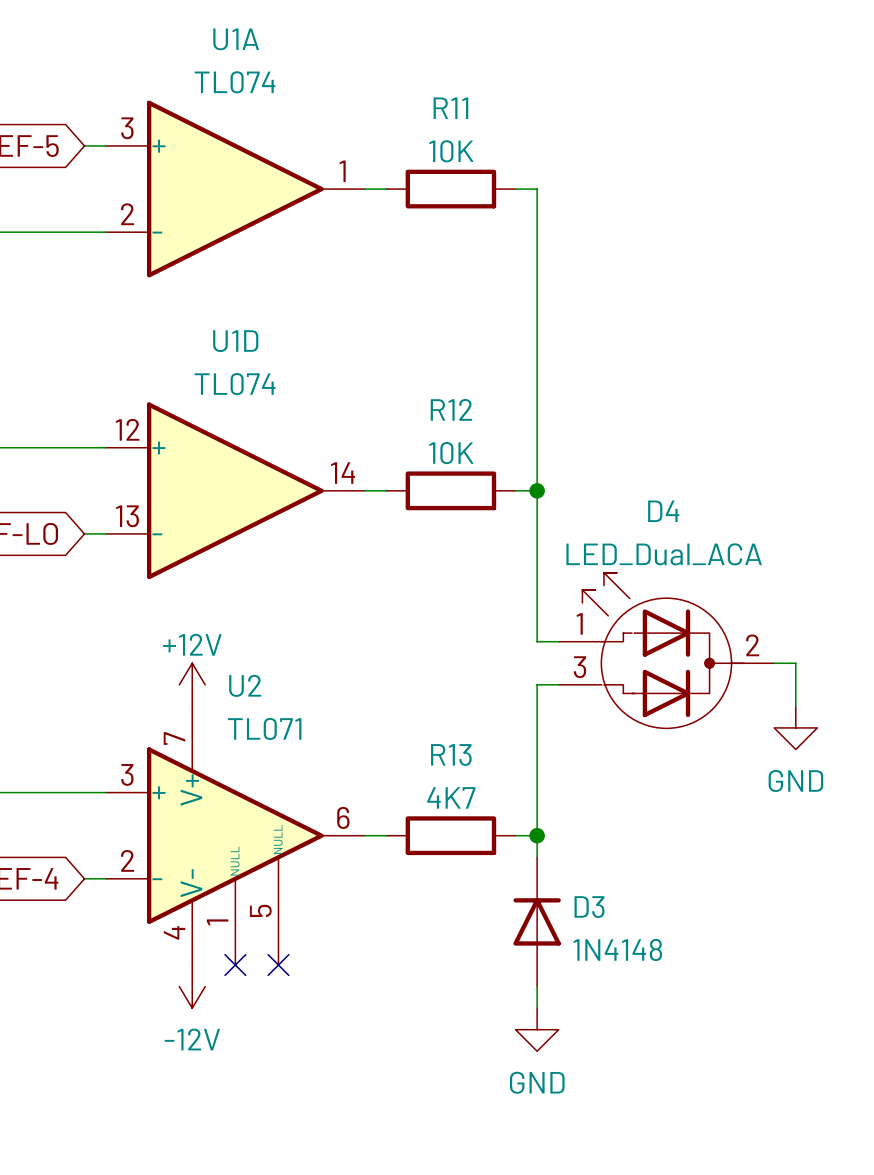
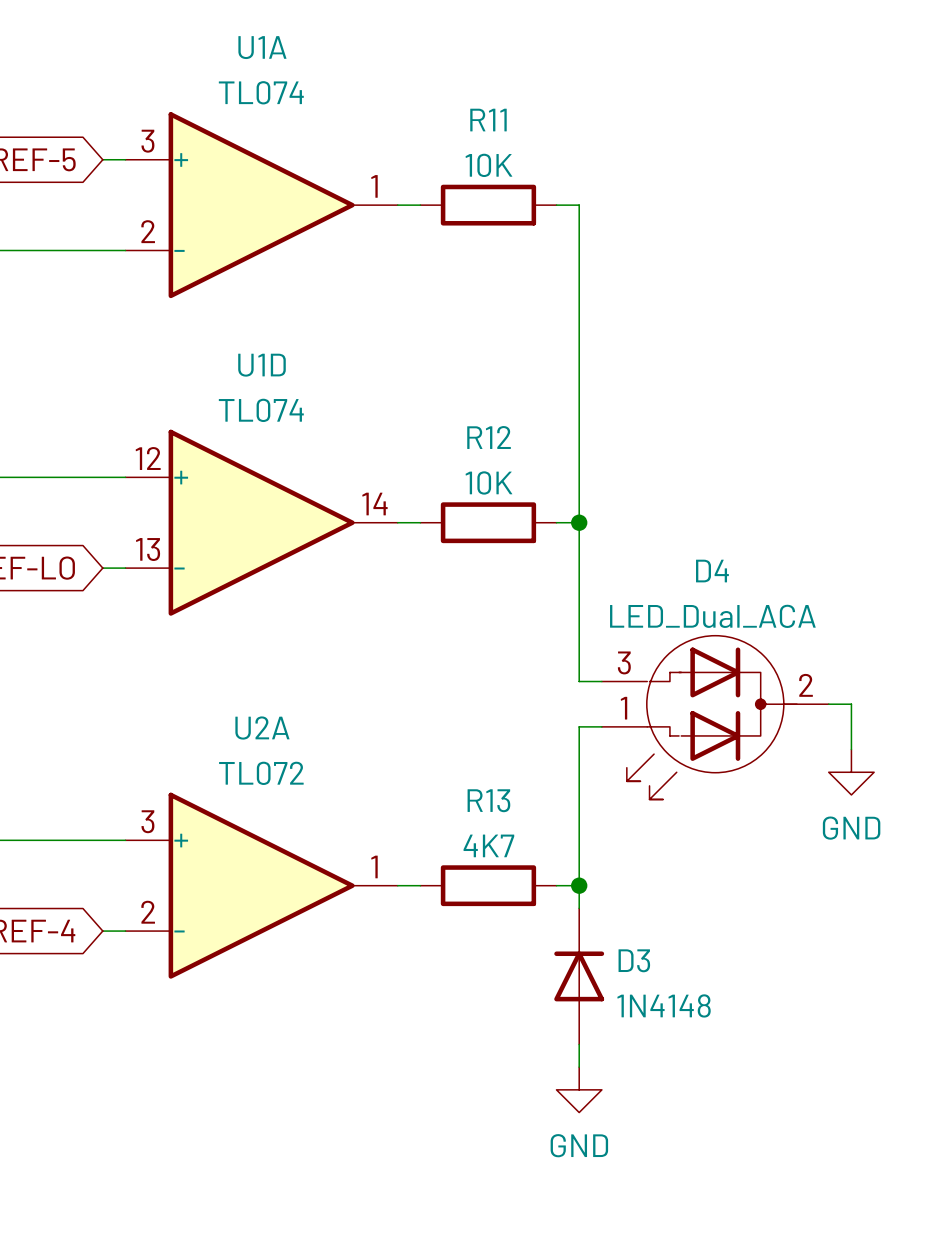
D4 flip: as is (663, 650) -> up-down (711, 717)
power symbol: +12V (192, 684) -> none
U2: TL071 (235, 835) -> none
U2A: none -> TL072 (261, 885)
no-connect mark: (235, 965) -> none
no-connect mark: (278, 965) -> none
power symbol: -12V (192, 986) -> none

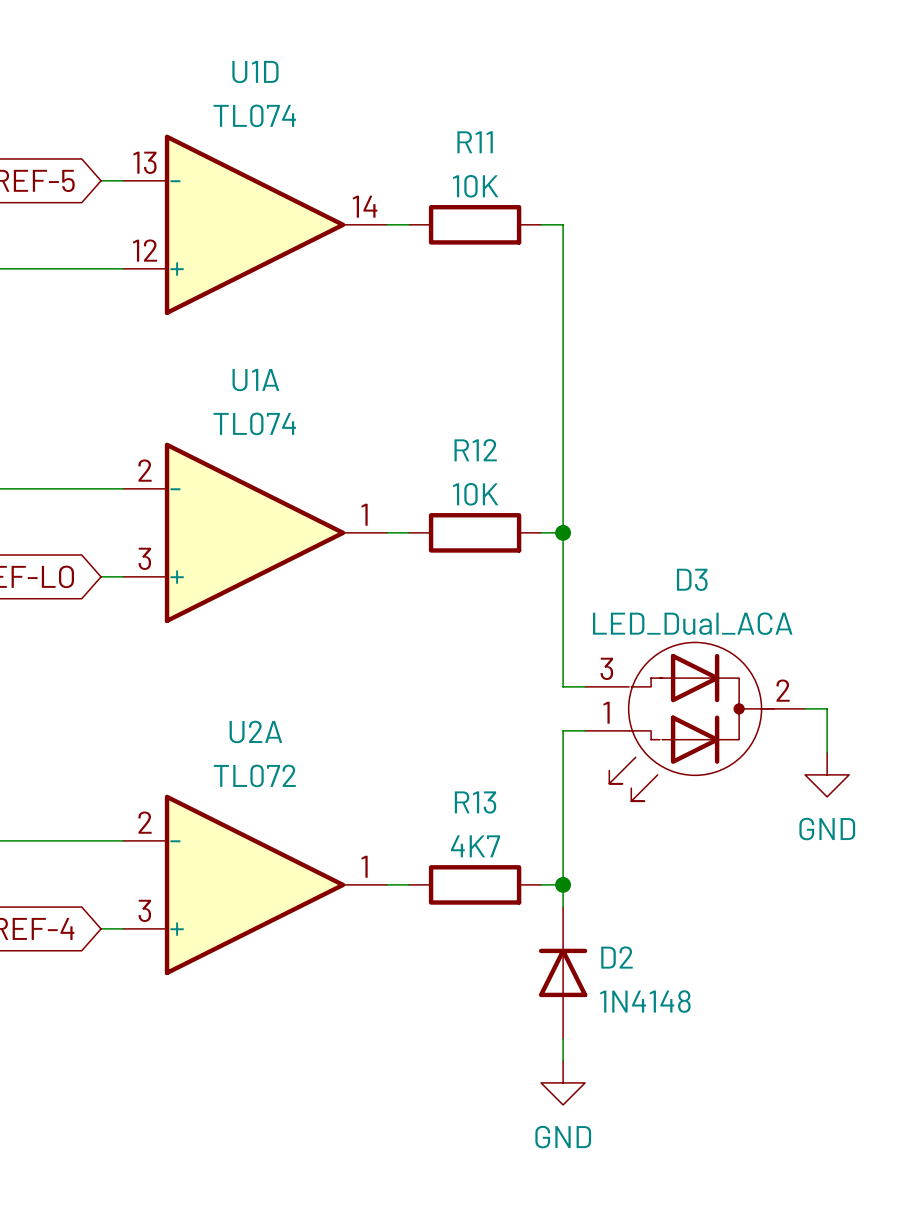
U1A flip: as is (261, 205) -> up-down (255, 532)
U1A position: (261, 205) -> (255, 532)
U1D flip: as is (261, 522) -> up-down (255, 224)
U1D position: (261, 522) -> (255, 224)
D4 name: D4 (712, 571) -> D3 (692, 579)
U2A flip: as is (261, 885) -> up-down (255, 884)
D3 name: D3 (634, 960) -> D2 (617, 957)

